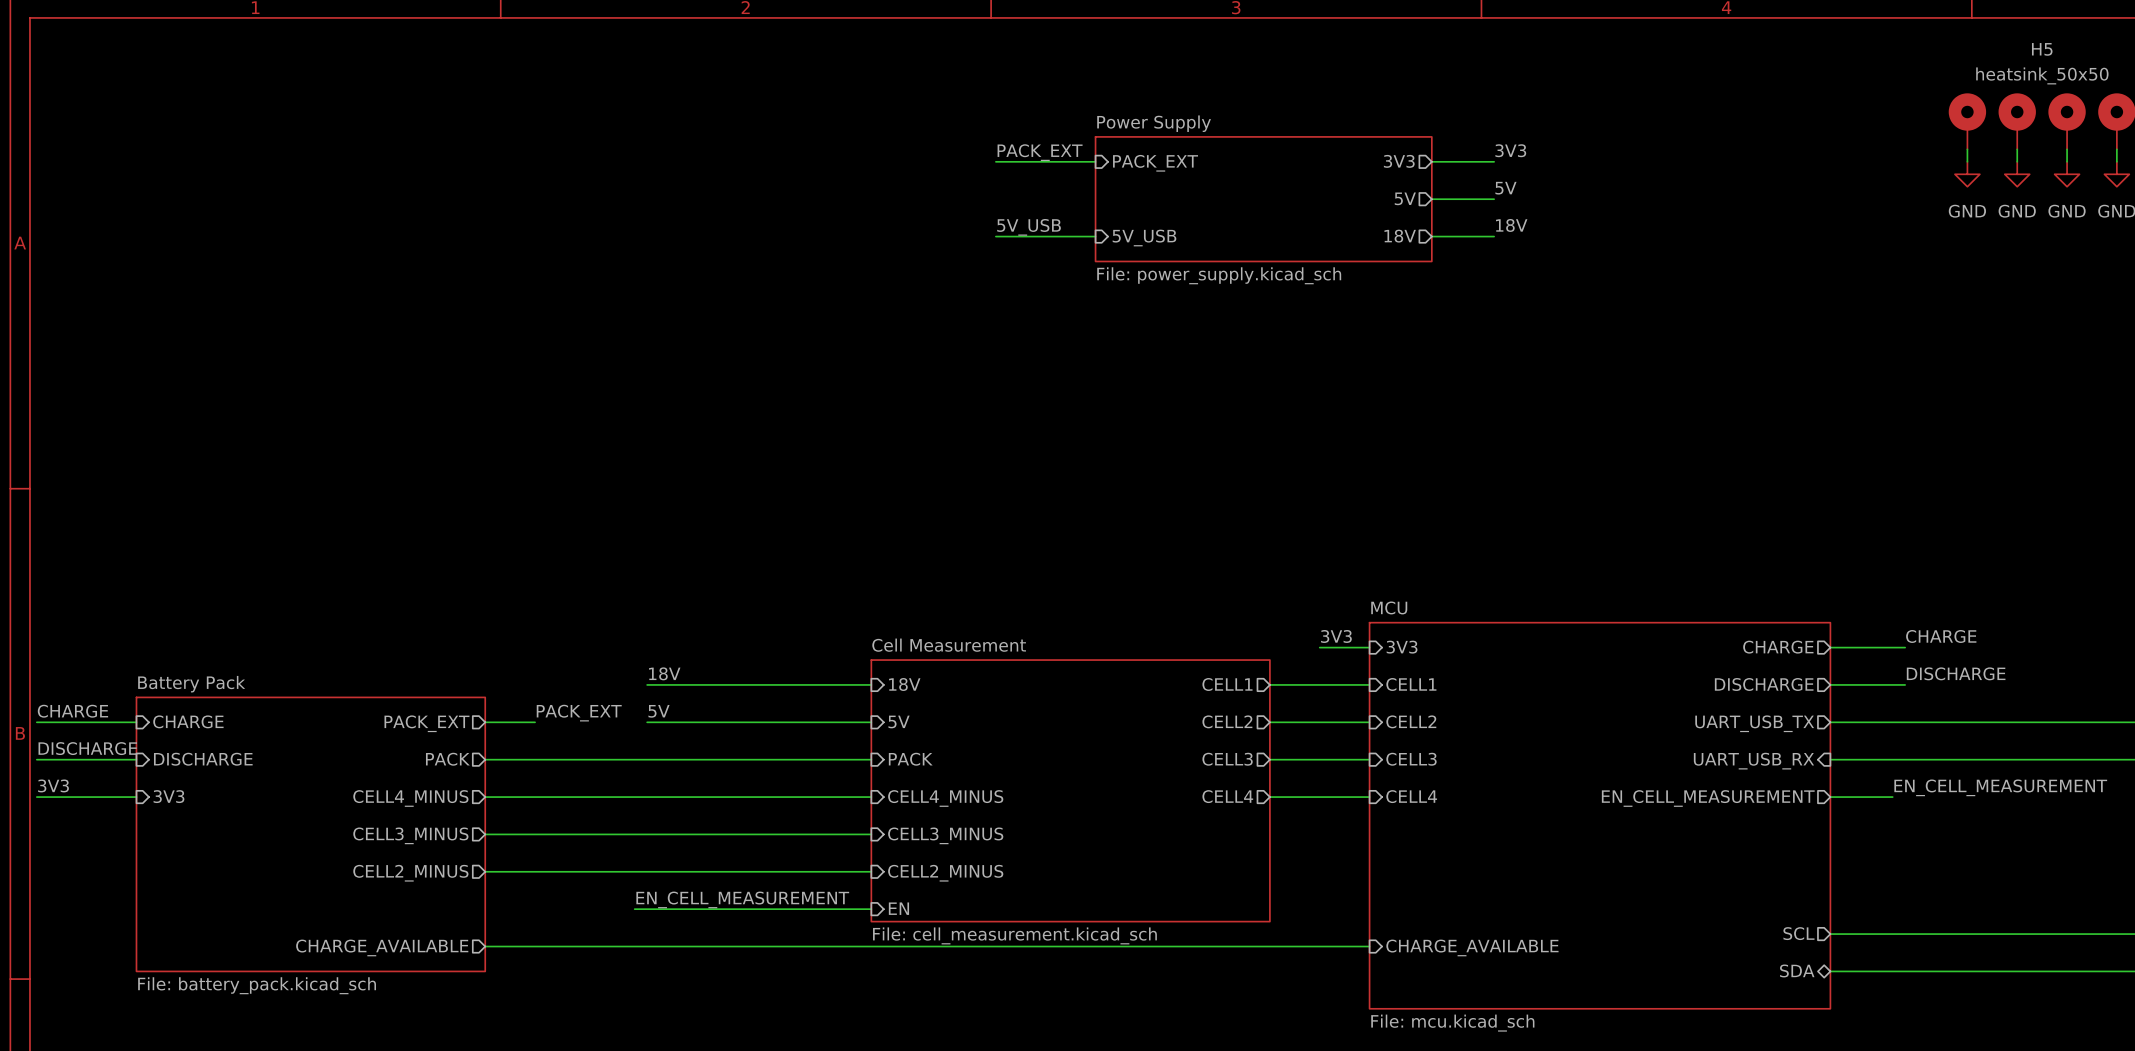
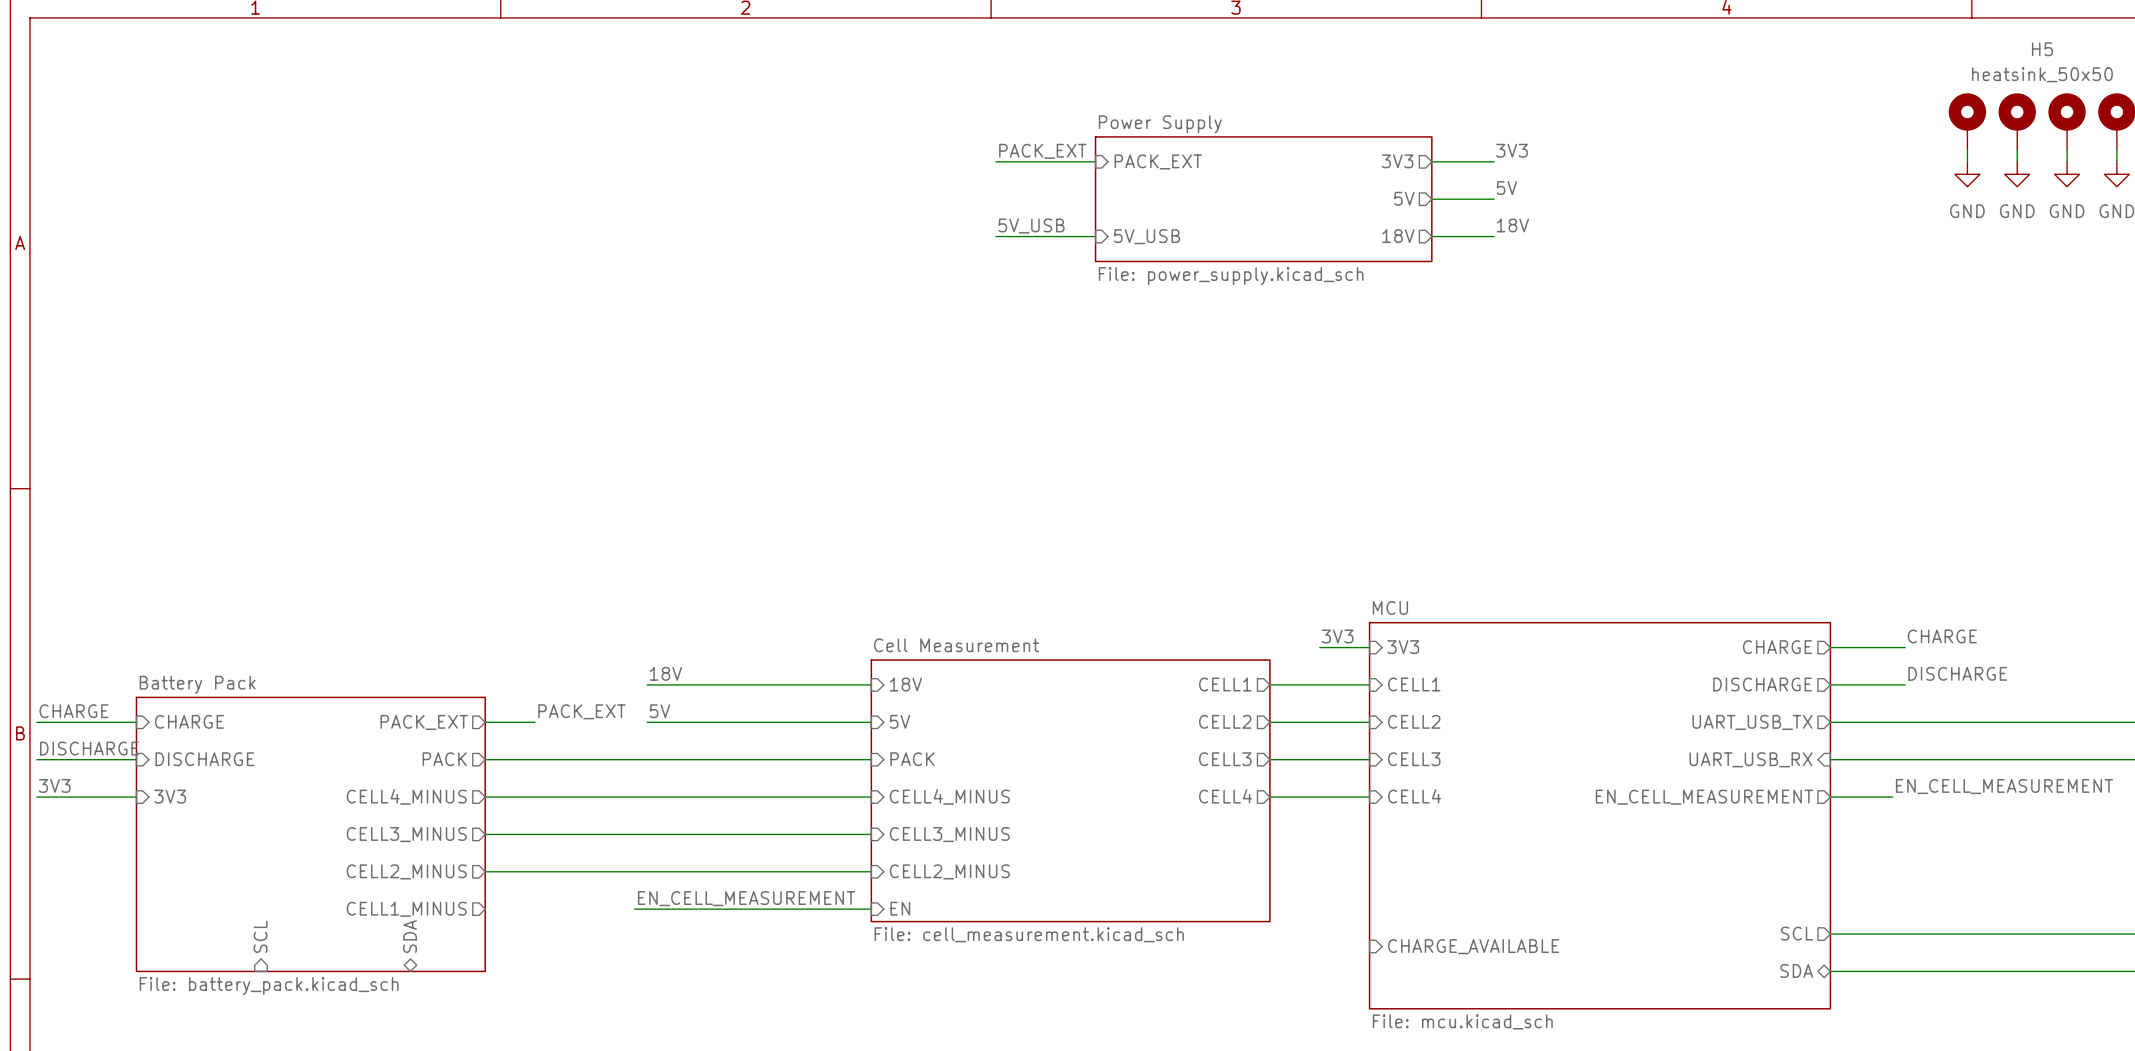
sheet pin: none -> CELL1_MINUS (406, 909)
sheet pin: none -> SDA (410, 936)
sheet pin: none -> SCL (260, 936)
wire: (485, 946) (1369, 946) -> none
sheet pin: CHARGE_AVAILABLE (382, 947) -> none

